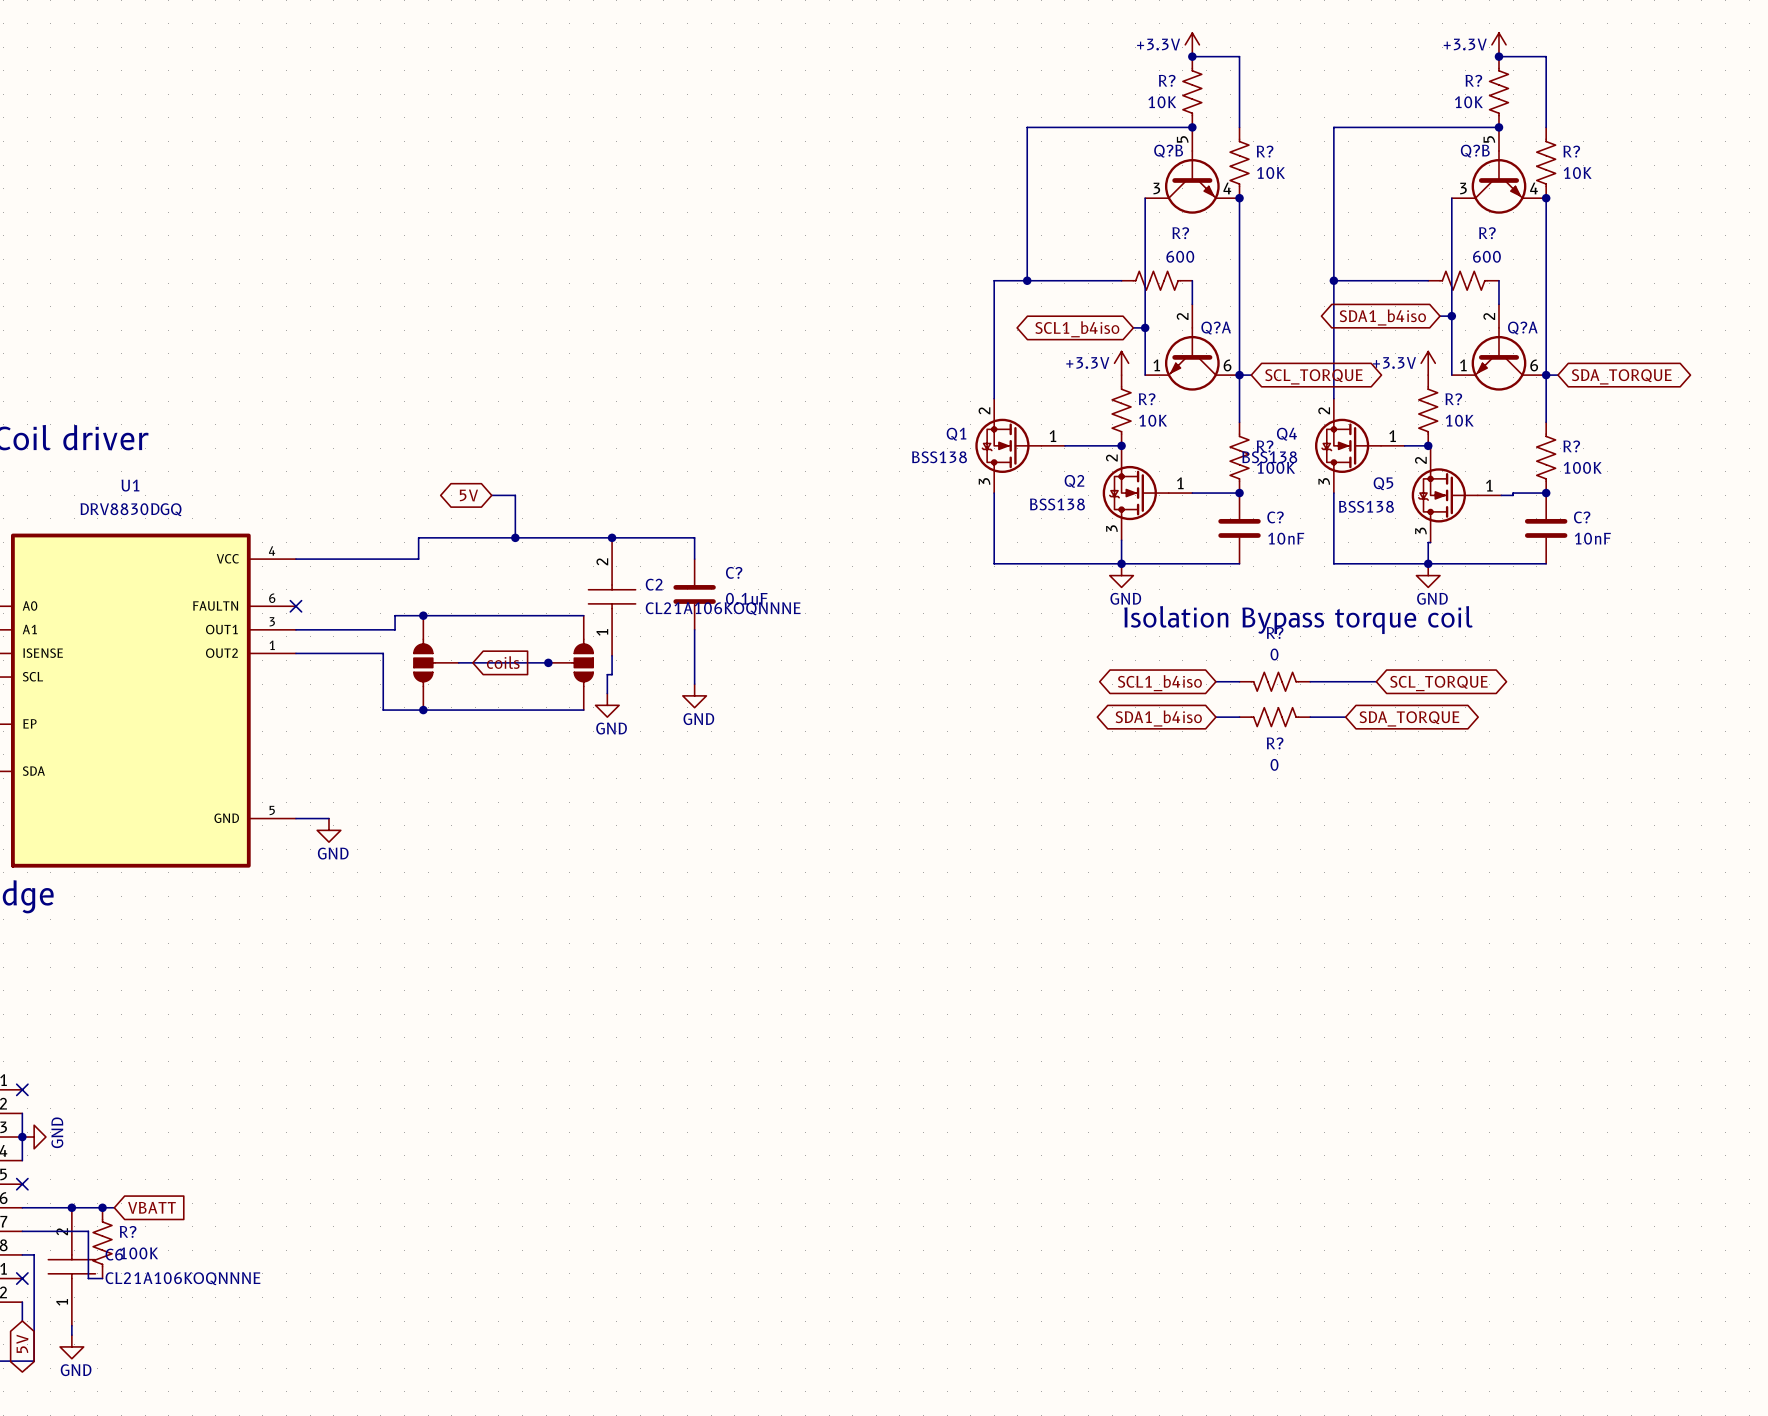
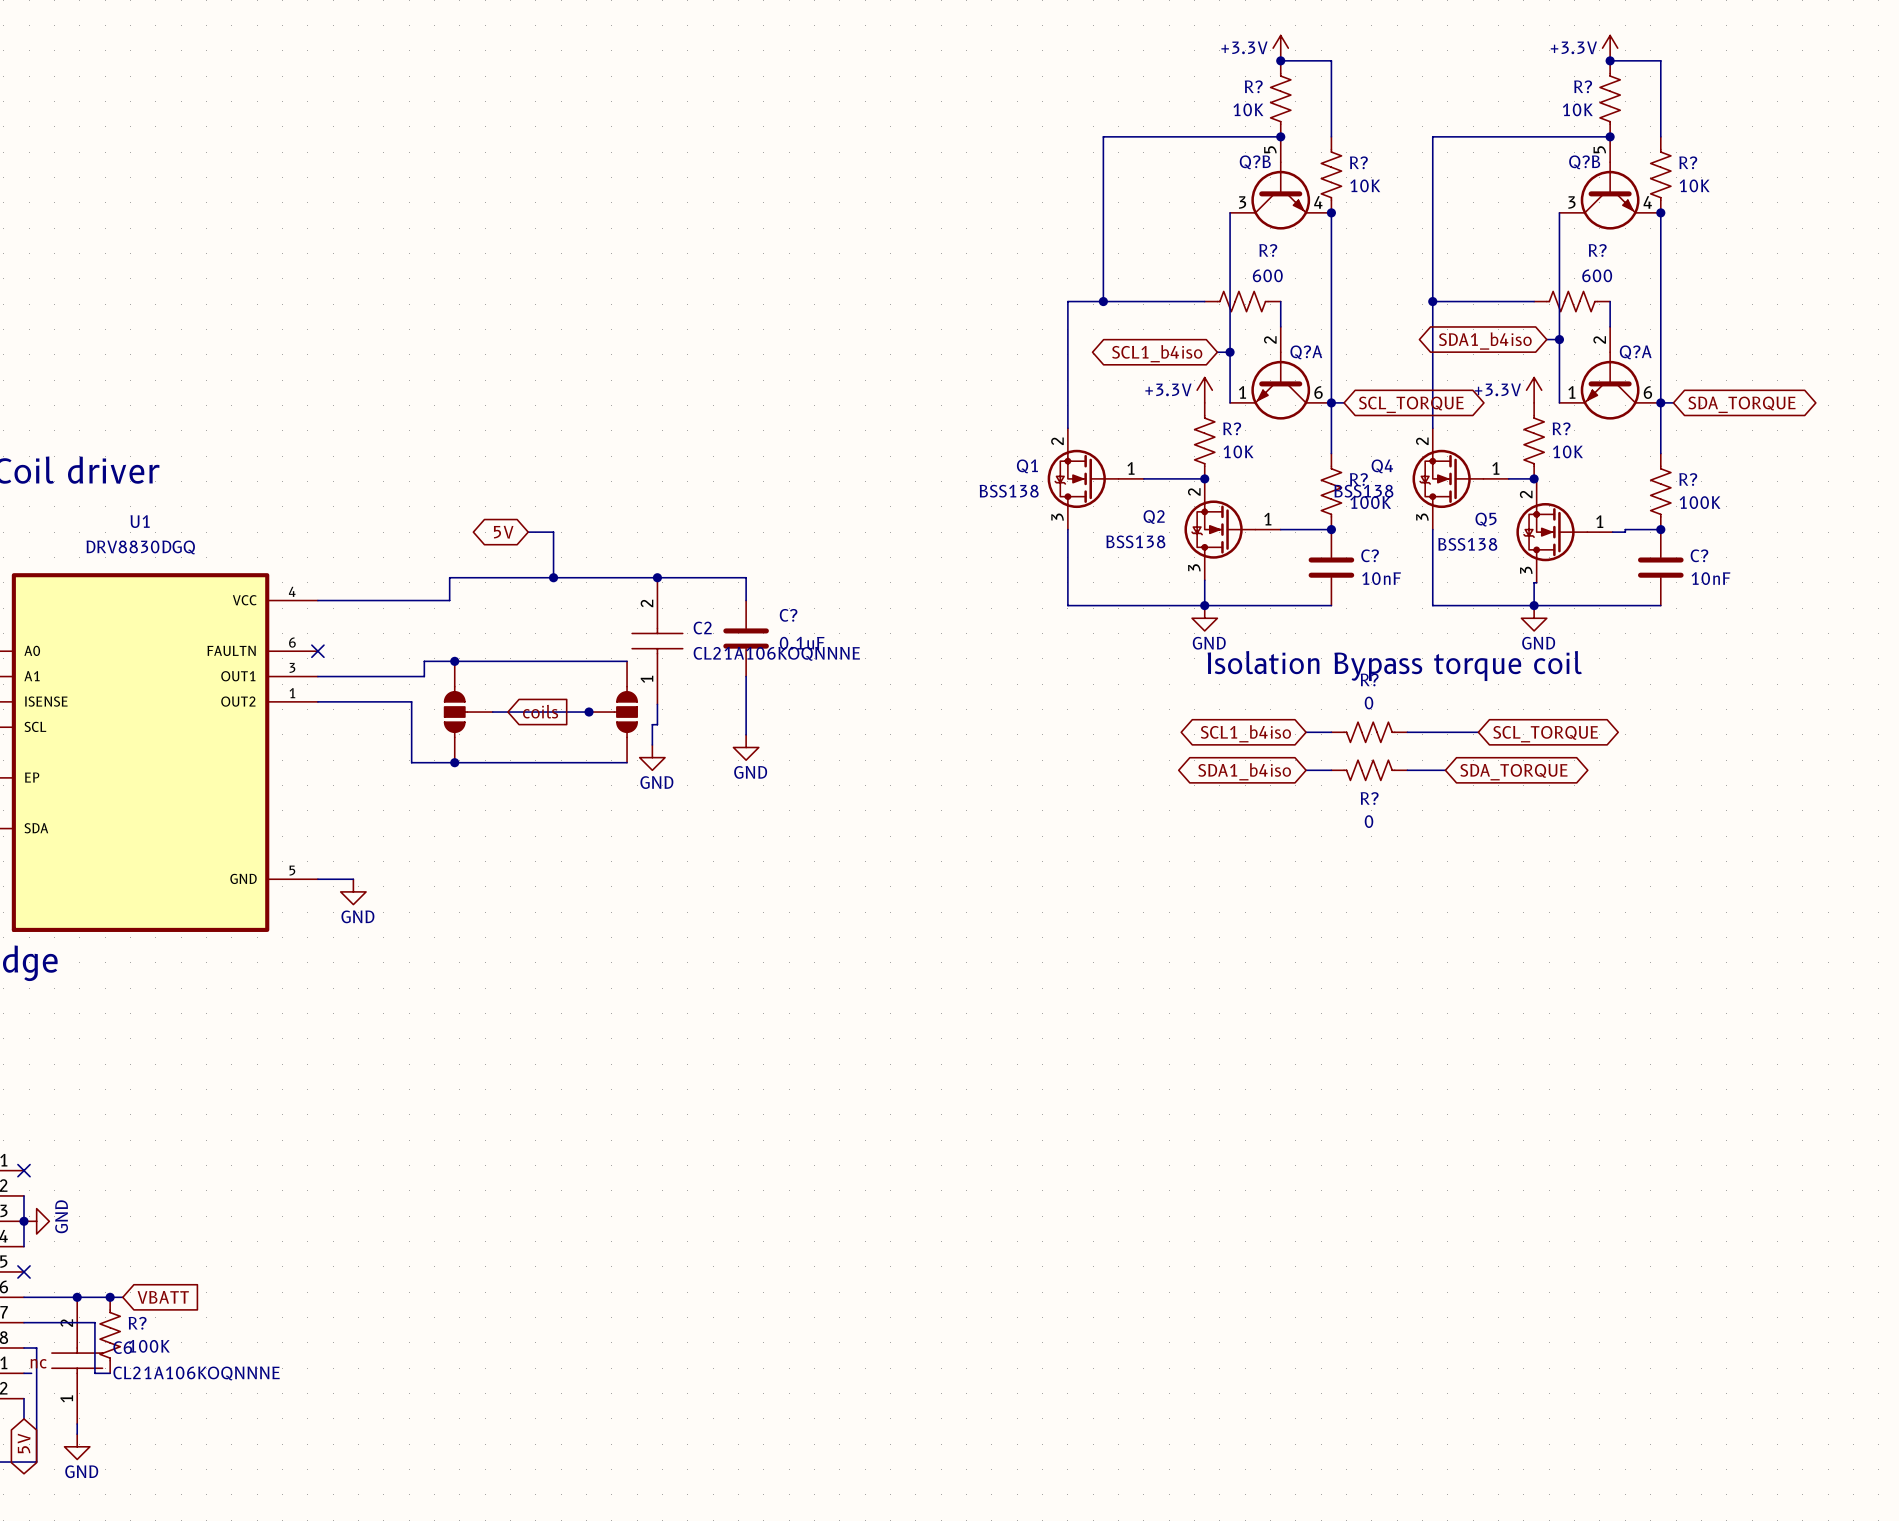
label: none -> nc (38, 1363)
wire: none -> (23, 1373) (31, 1373)
no-connect mark: (22, 1278) -> none

